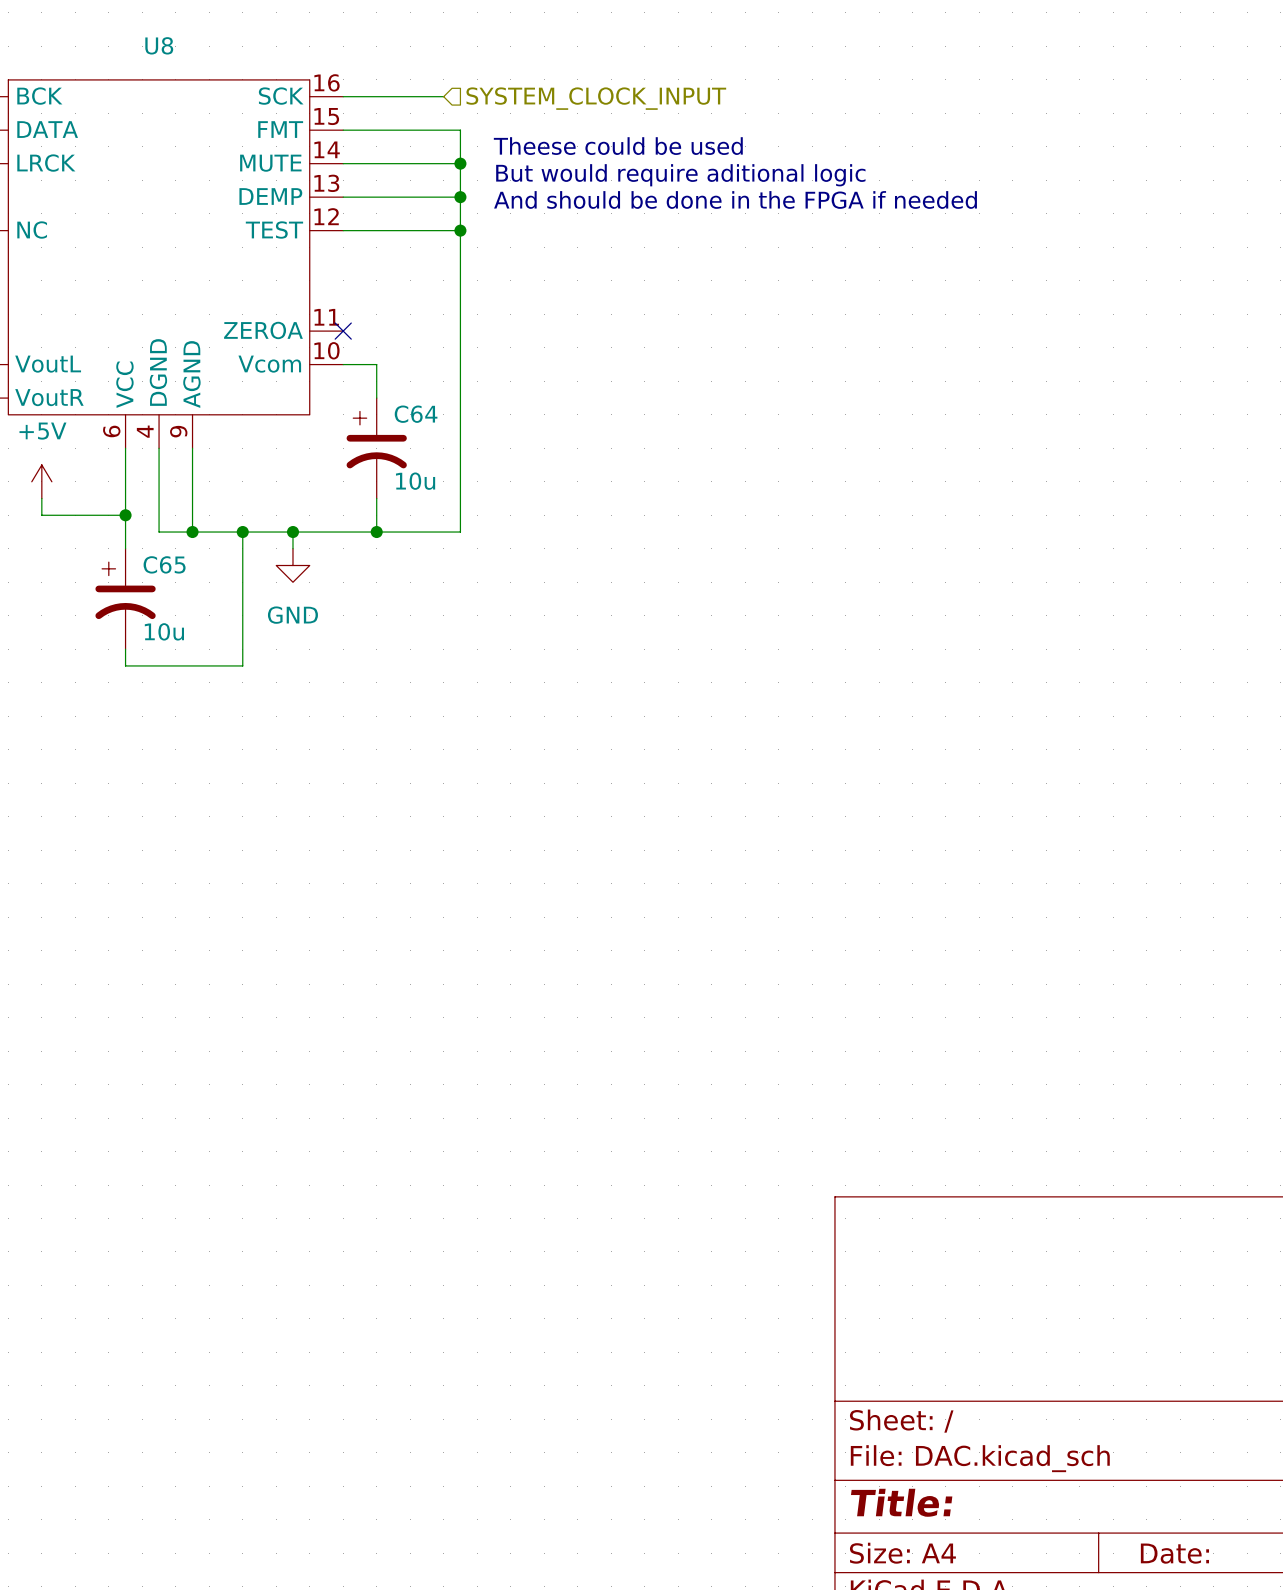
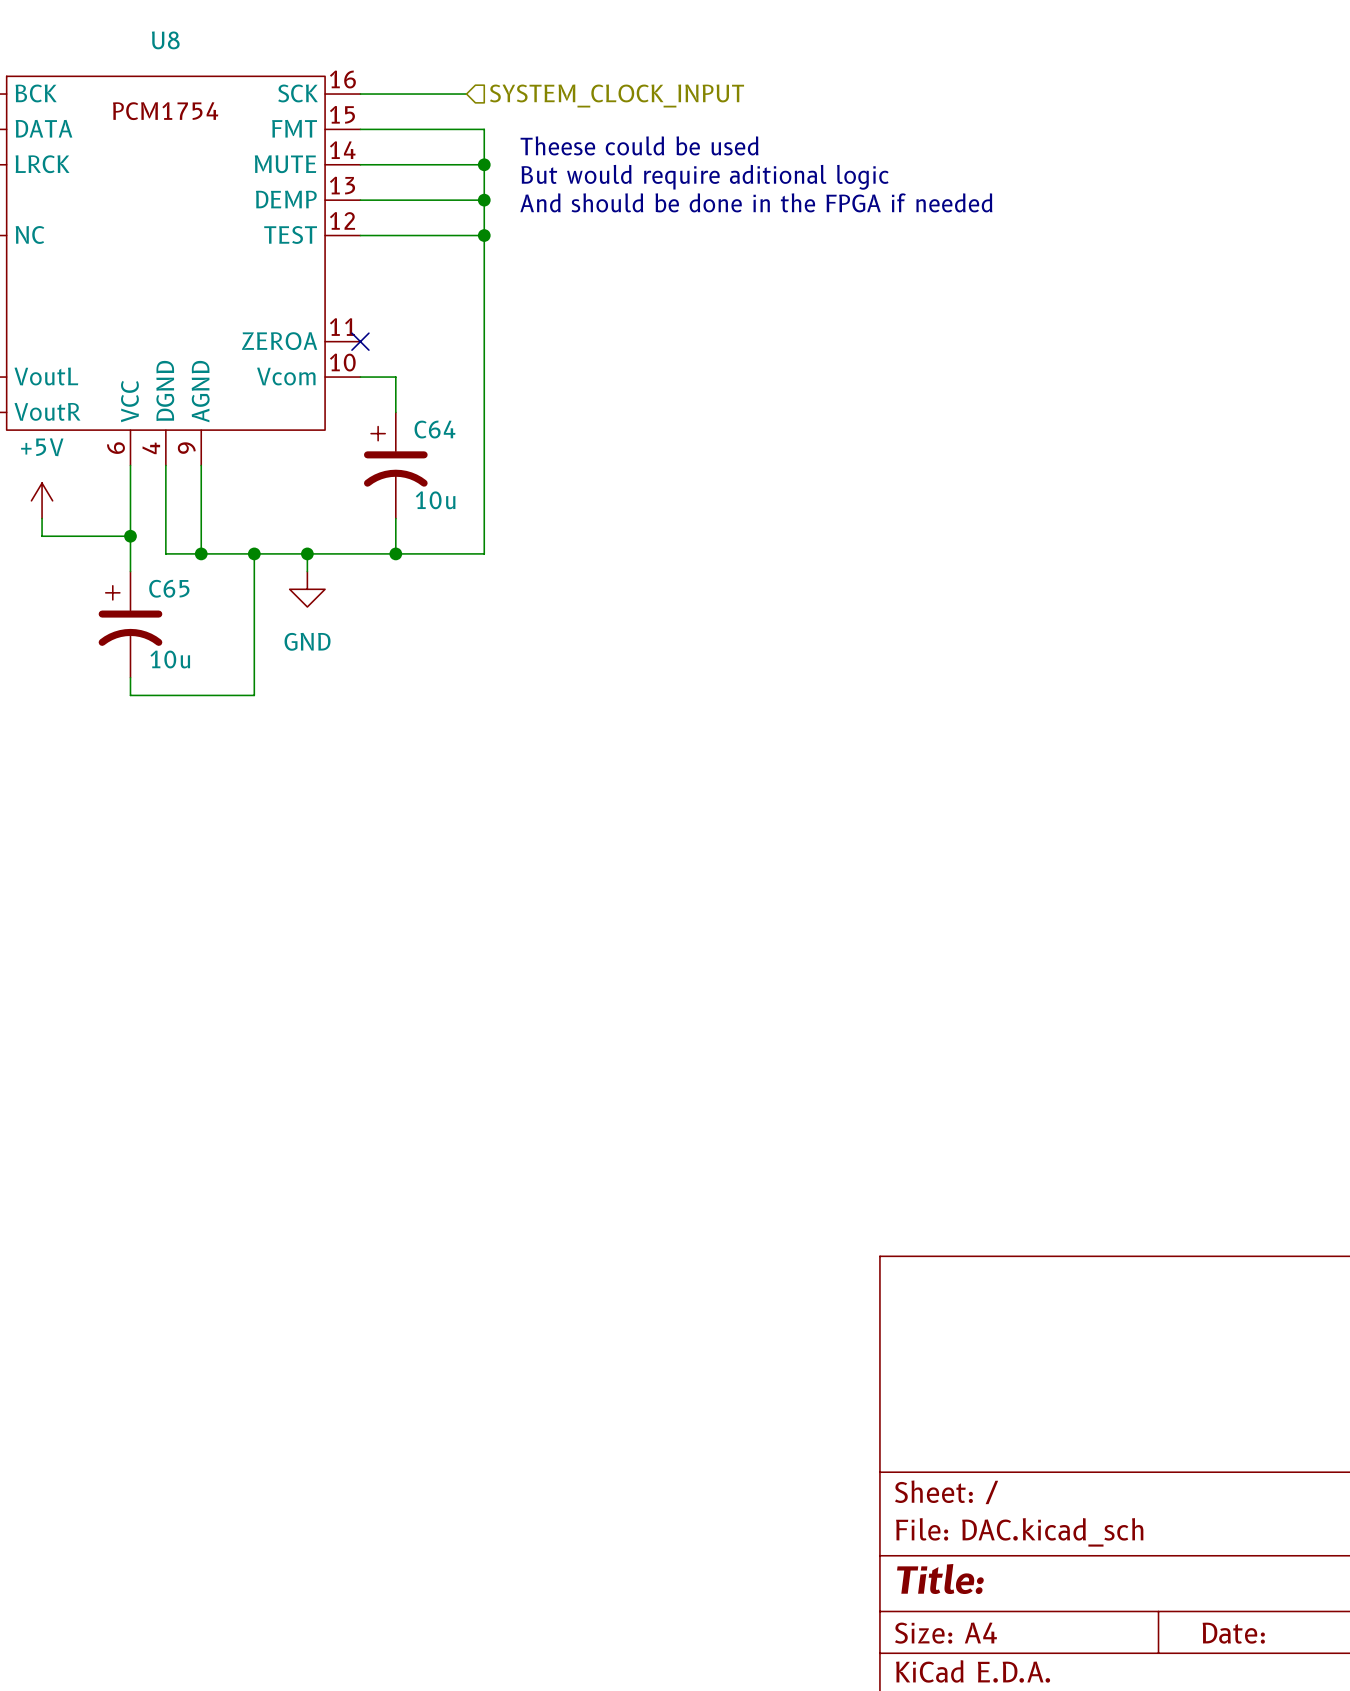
U8 text: none -> PCM1754 (165, 111)

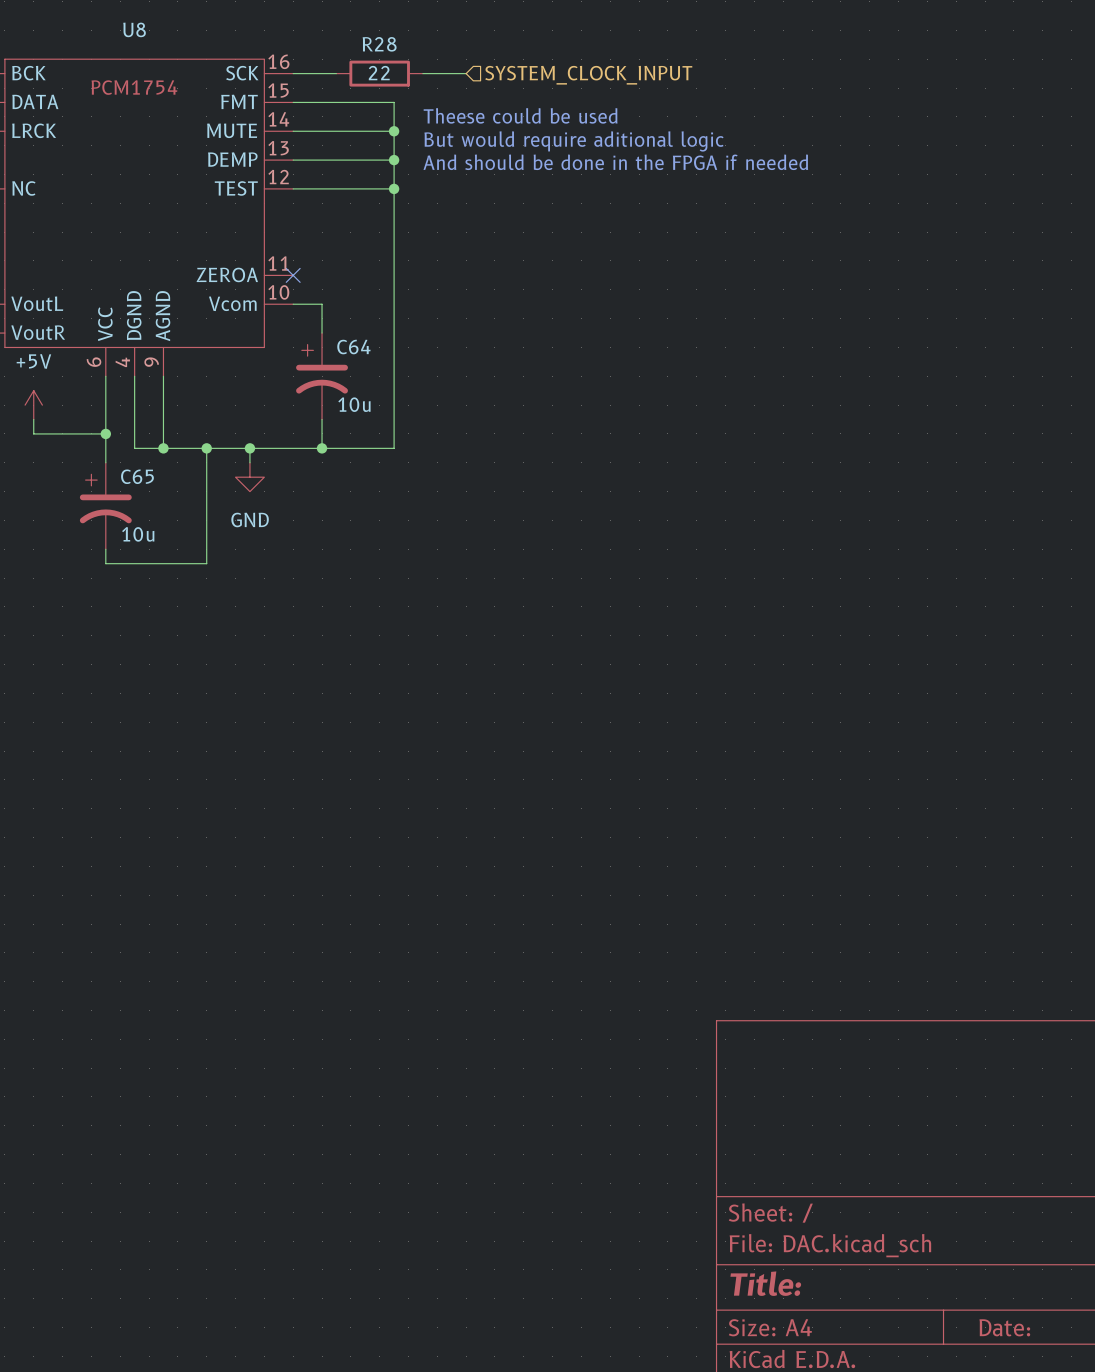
wire: (413, 94) (466, 94) -> (422, 73) (466, 73)
R28: none -> 22 (379, 73)
hierarchical label position: SYSTEM_CLOCK_INPUT (617, 96) -> SYSTEM_CLOCK_INPUT (588, 75)

